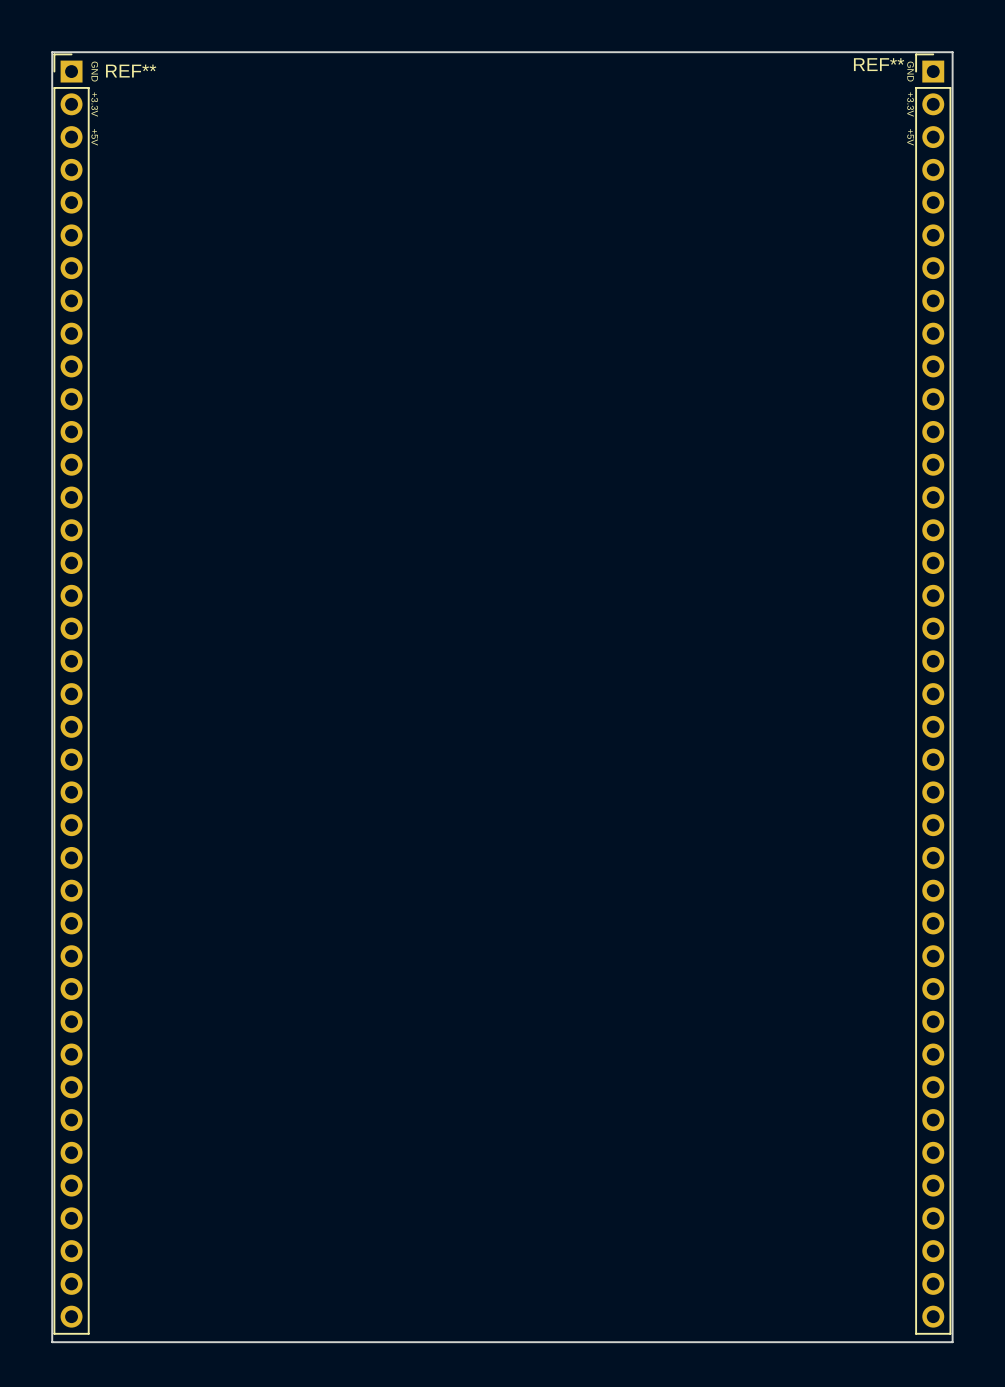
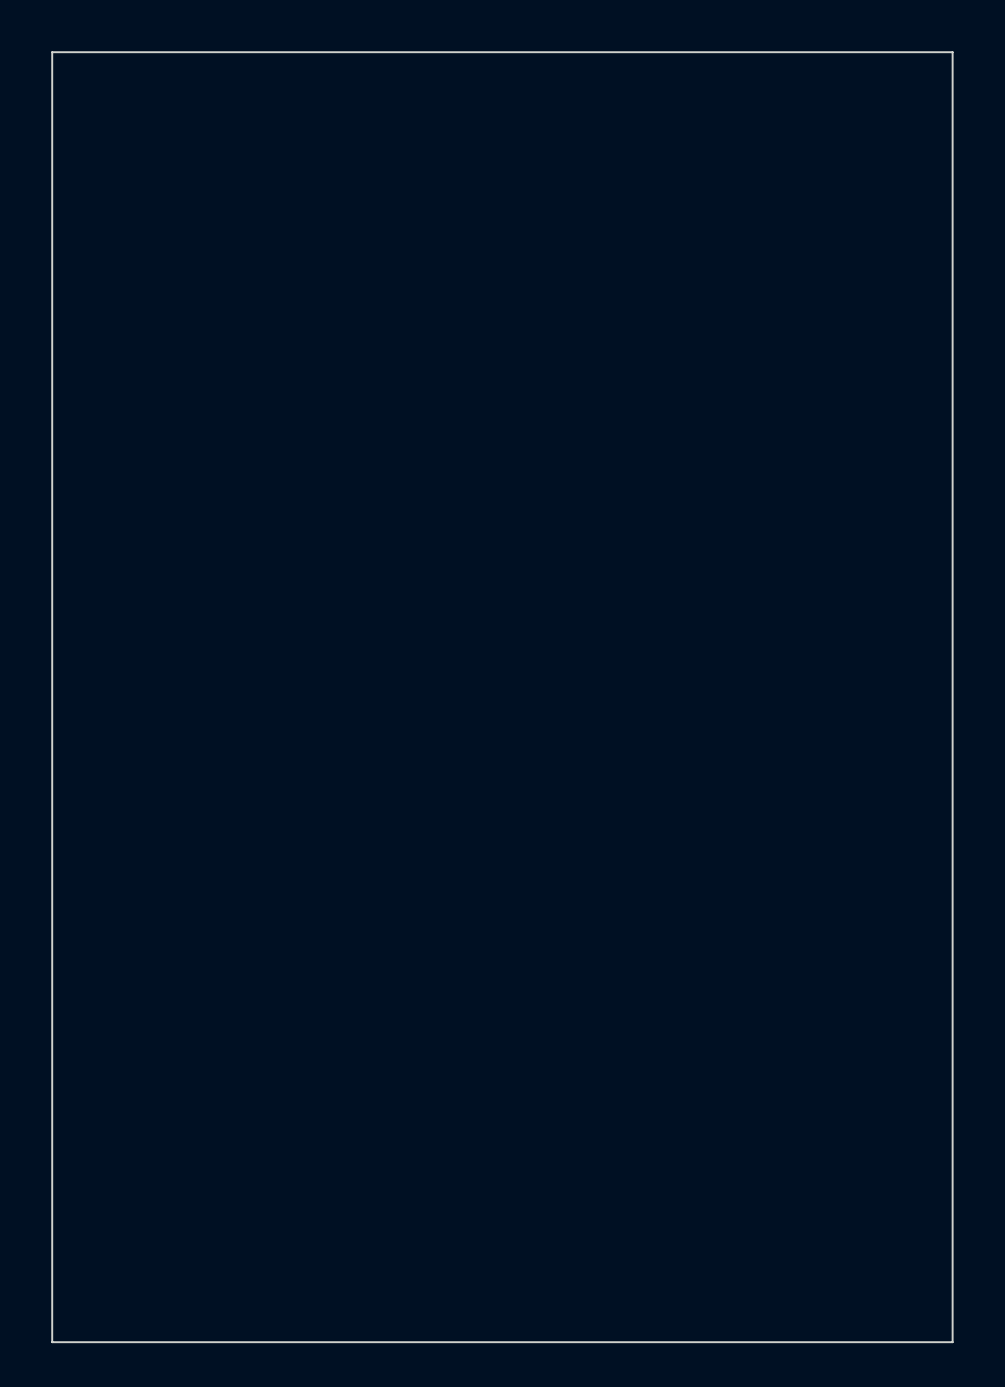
REF**: (71, 694) -> none
REF**: (933, 694) -> none

